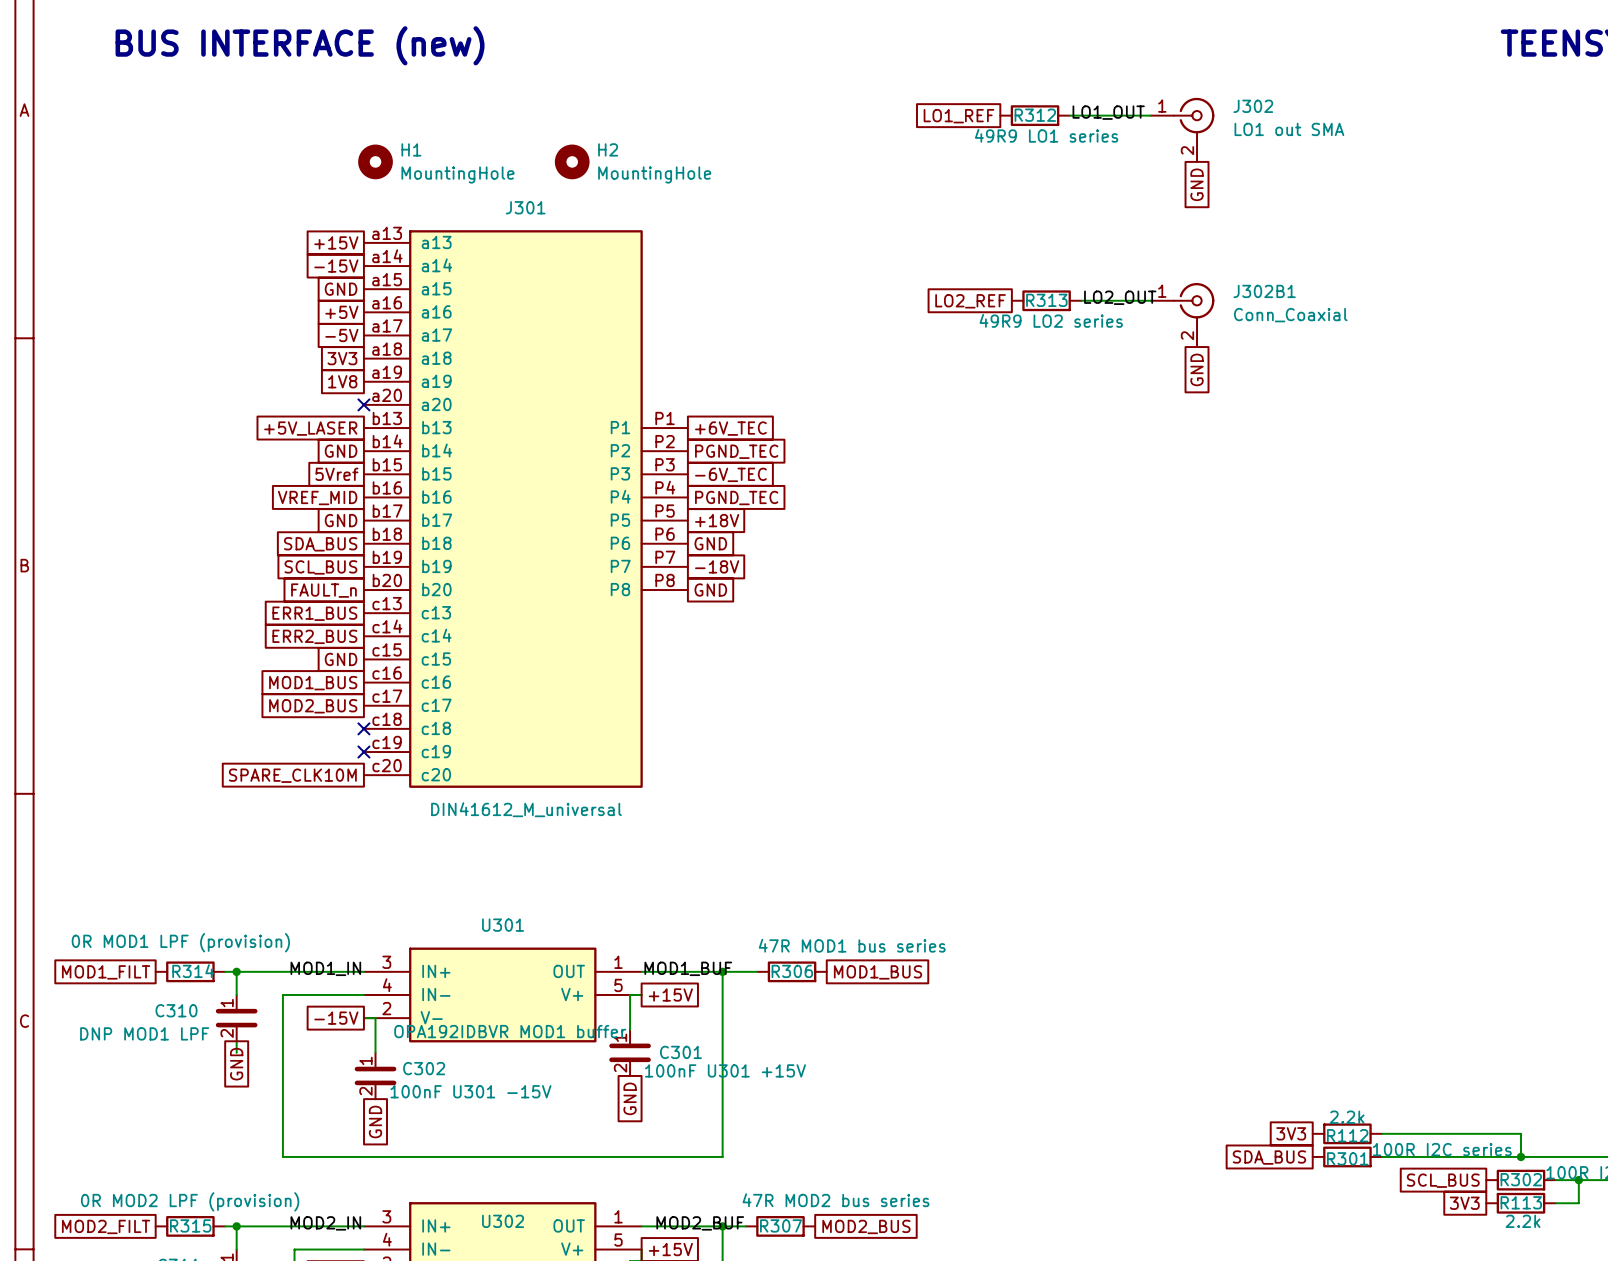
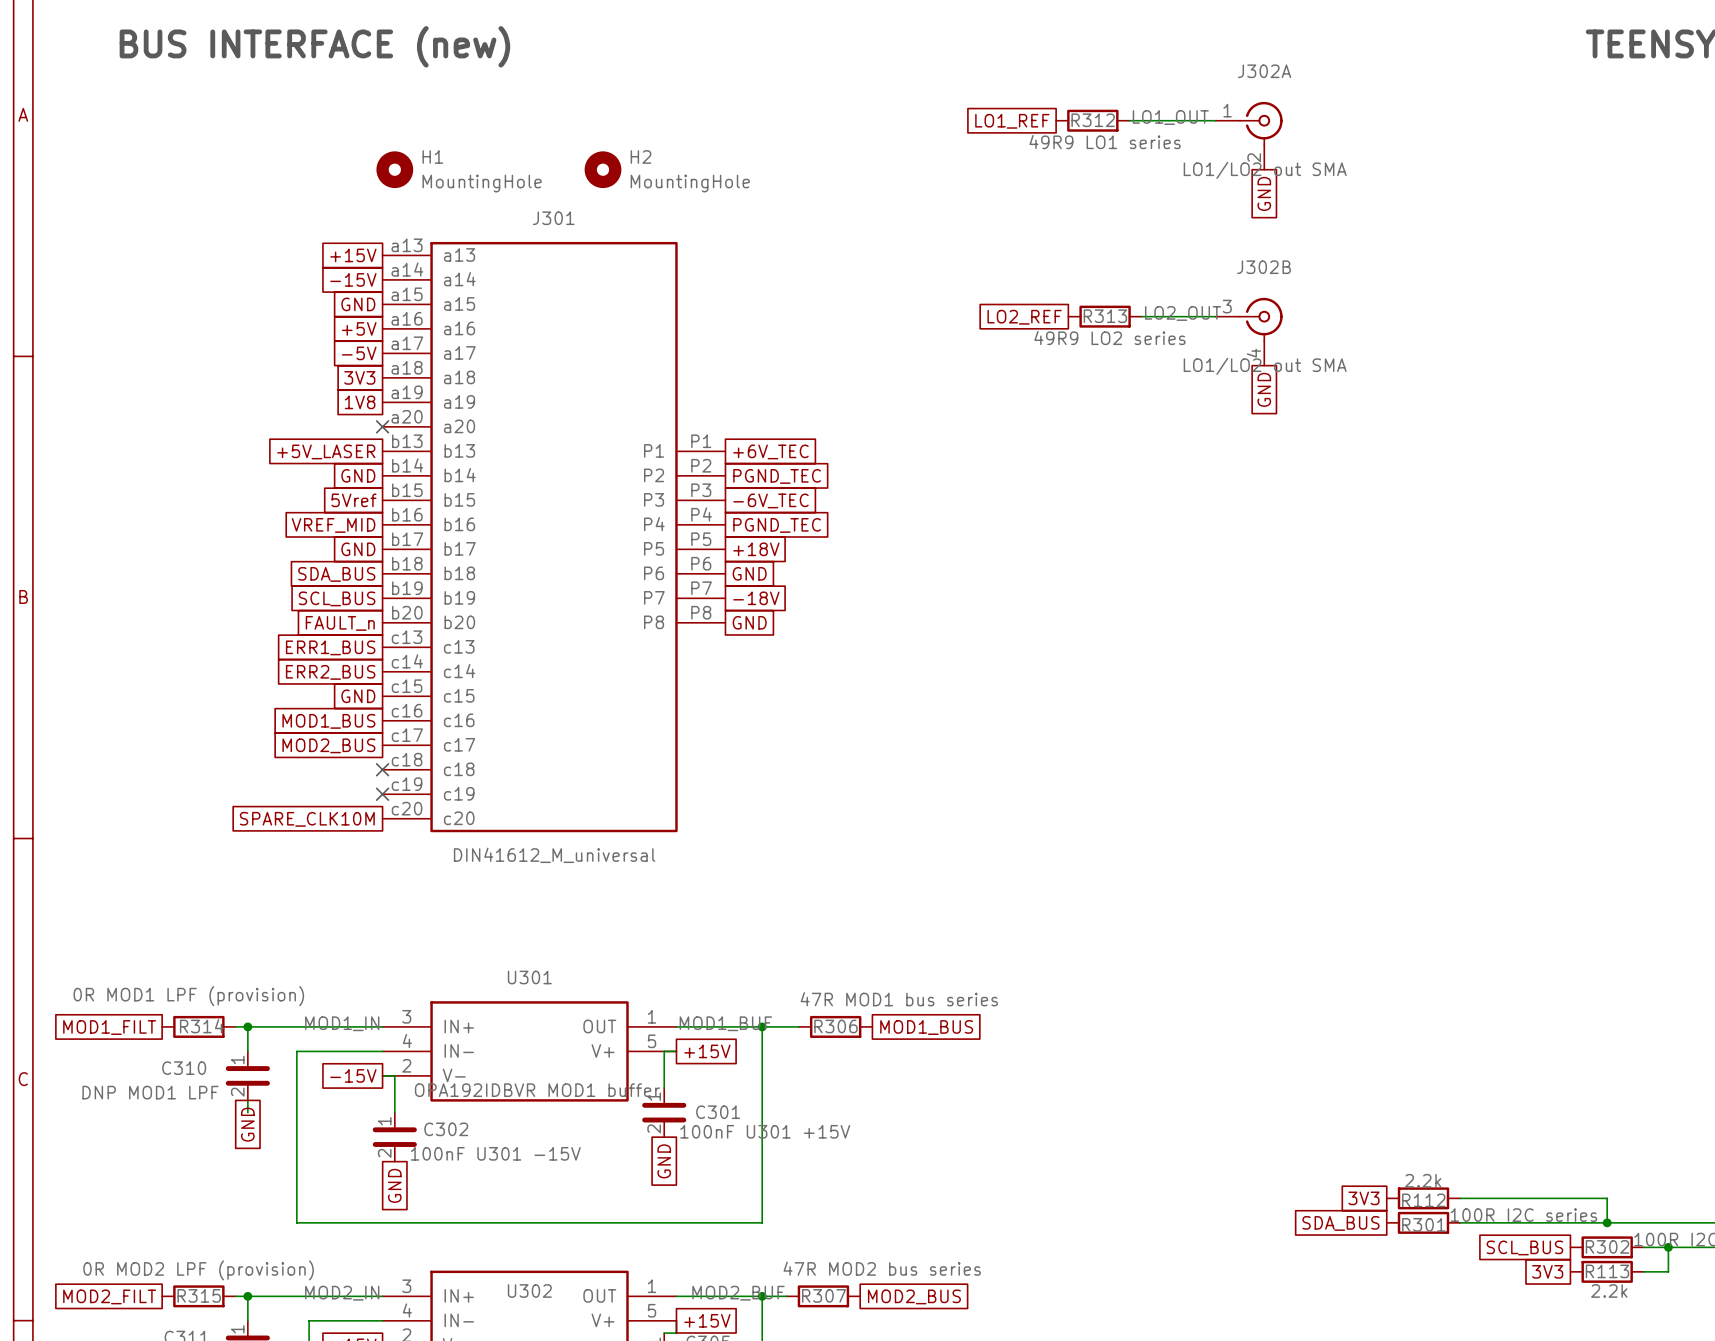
J302 name: J302 (1253, 106) -> J302A (1264, 71)
J302 value: LO1 out SMA (1289, 129) -> LO1/LO2 out SMA (1265, 170)
J302B1 pin number: 1 (1162, 291) -> 3 (1227, 306)
J302B1 name: J302B1 (1264, 291) -> J302B (1264, 267)
J302B1 value: Conn_Coaxial (1290, 315) -> LO1/LO2 out SMA (1265, 366)
J302B1 pin number: 2 (1187, 335) -> 4 (1253, 353)

